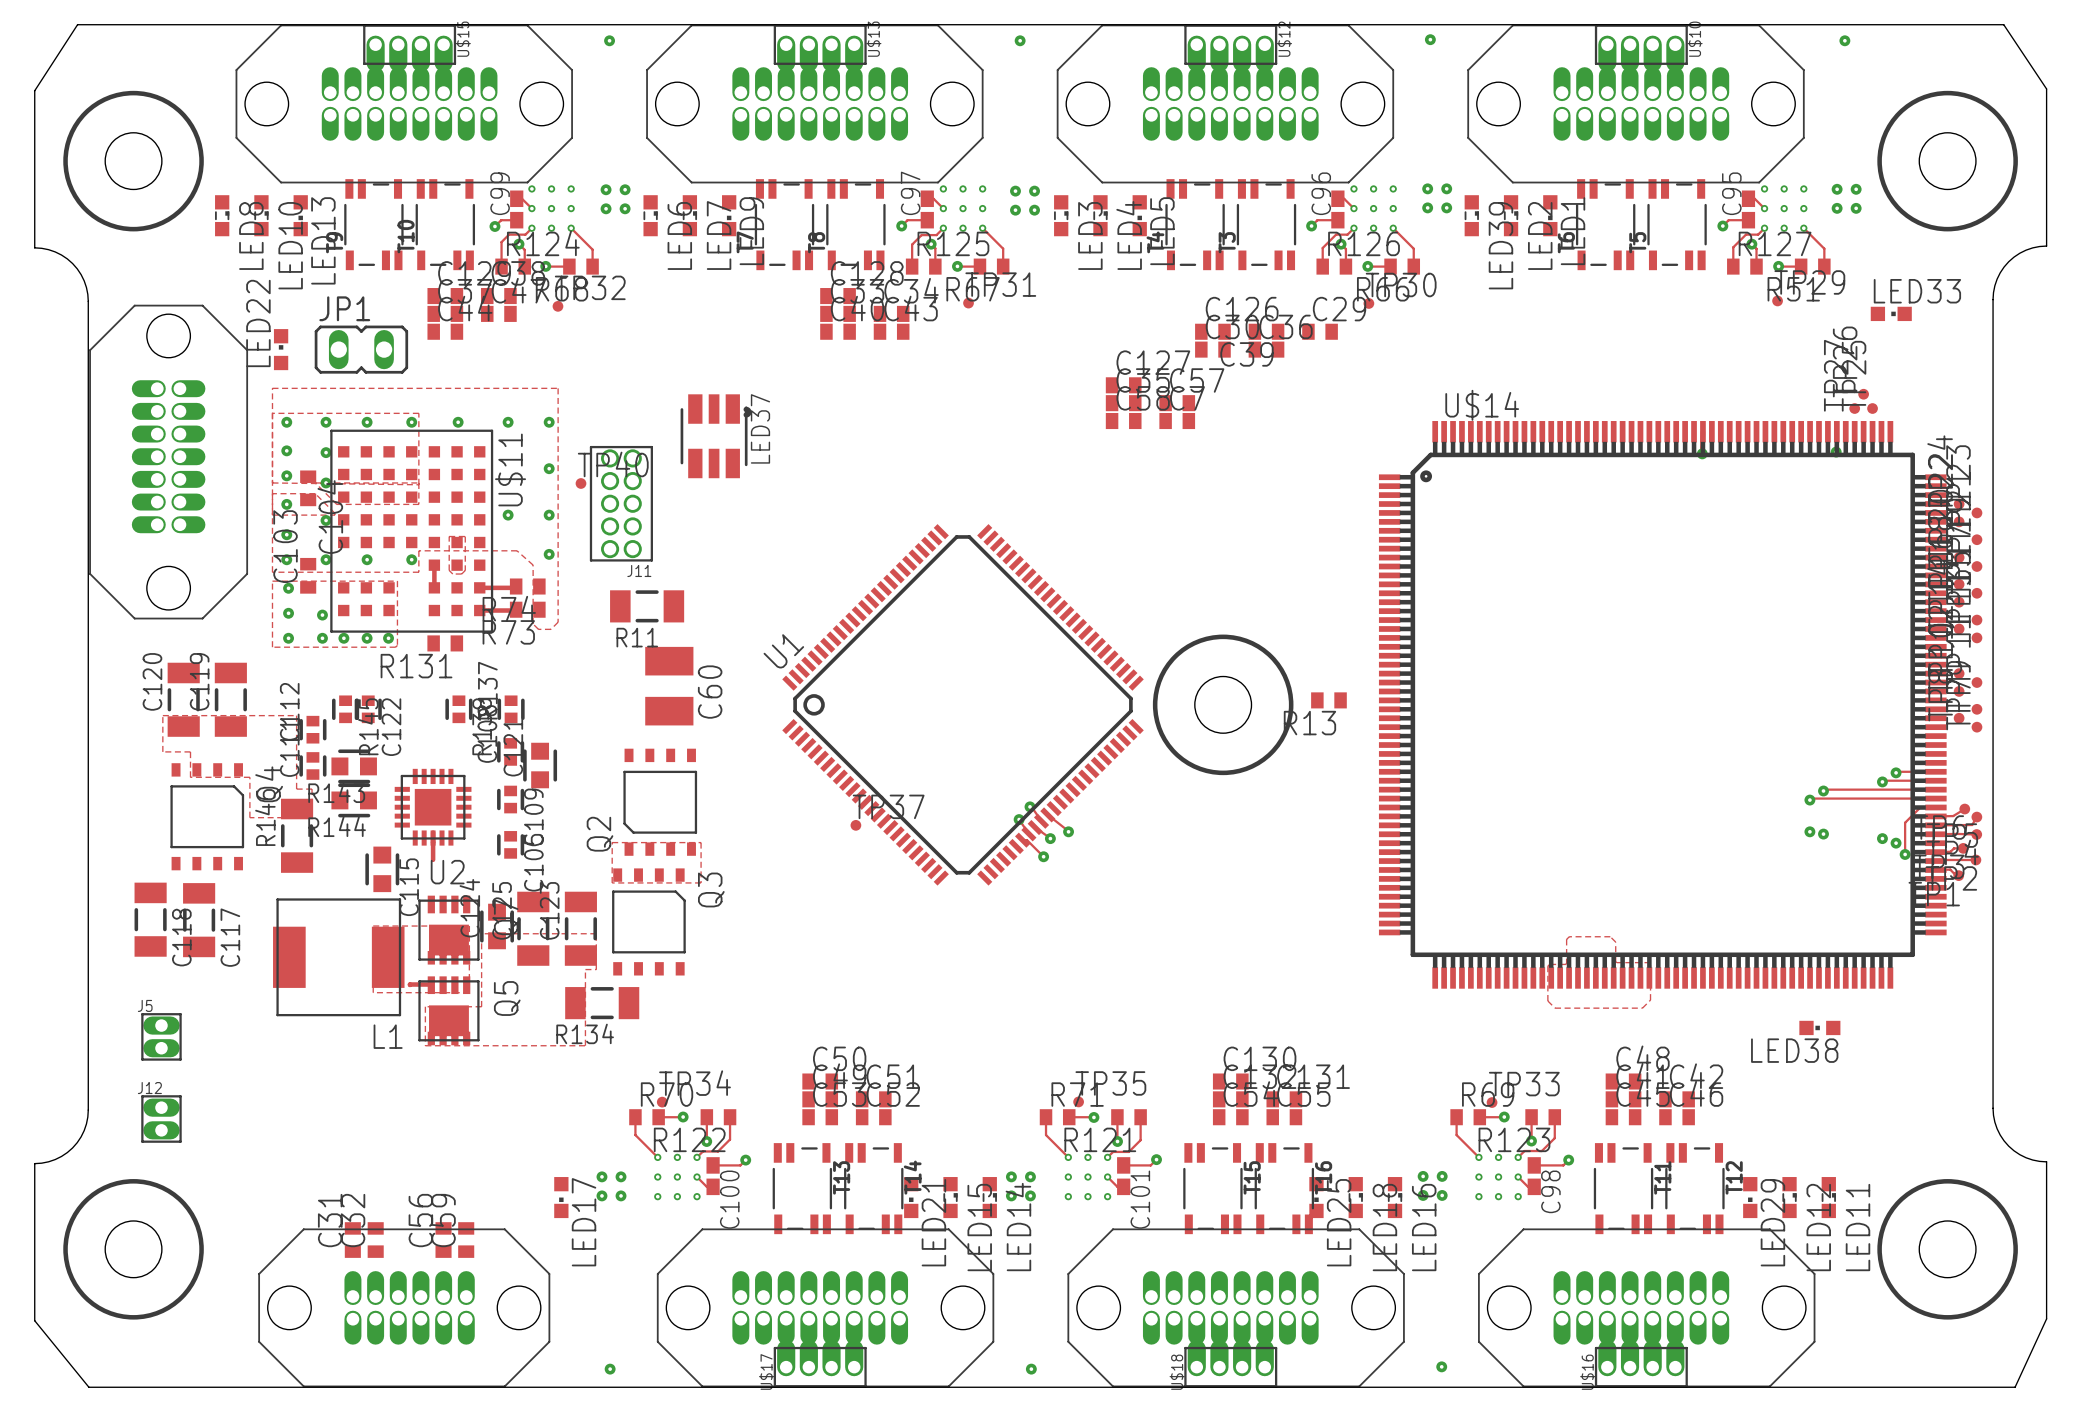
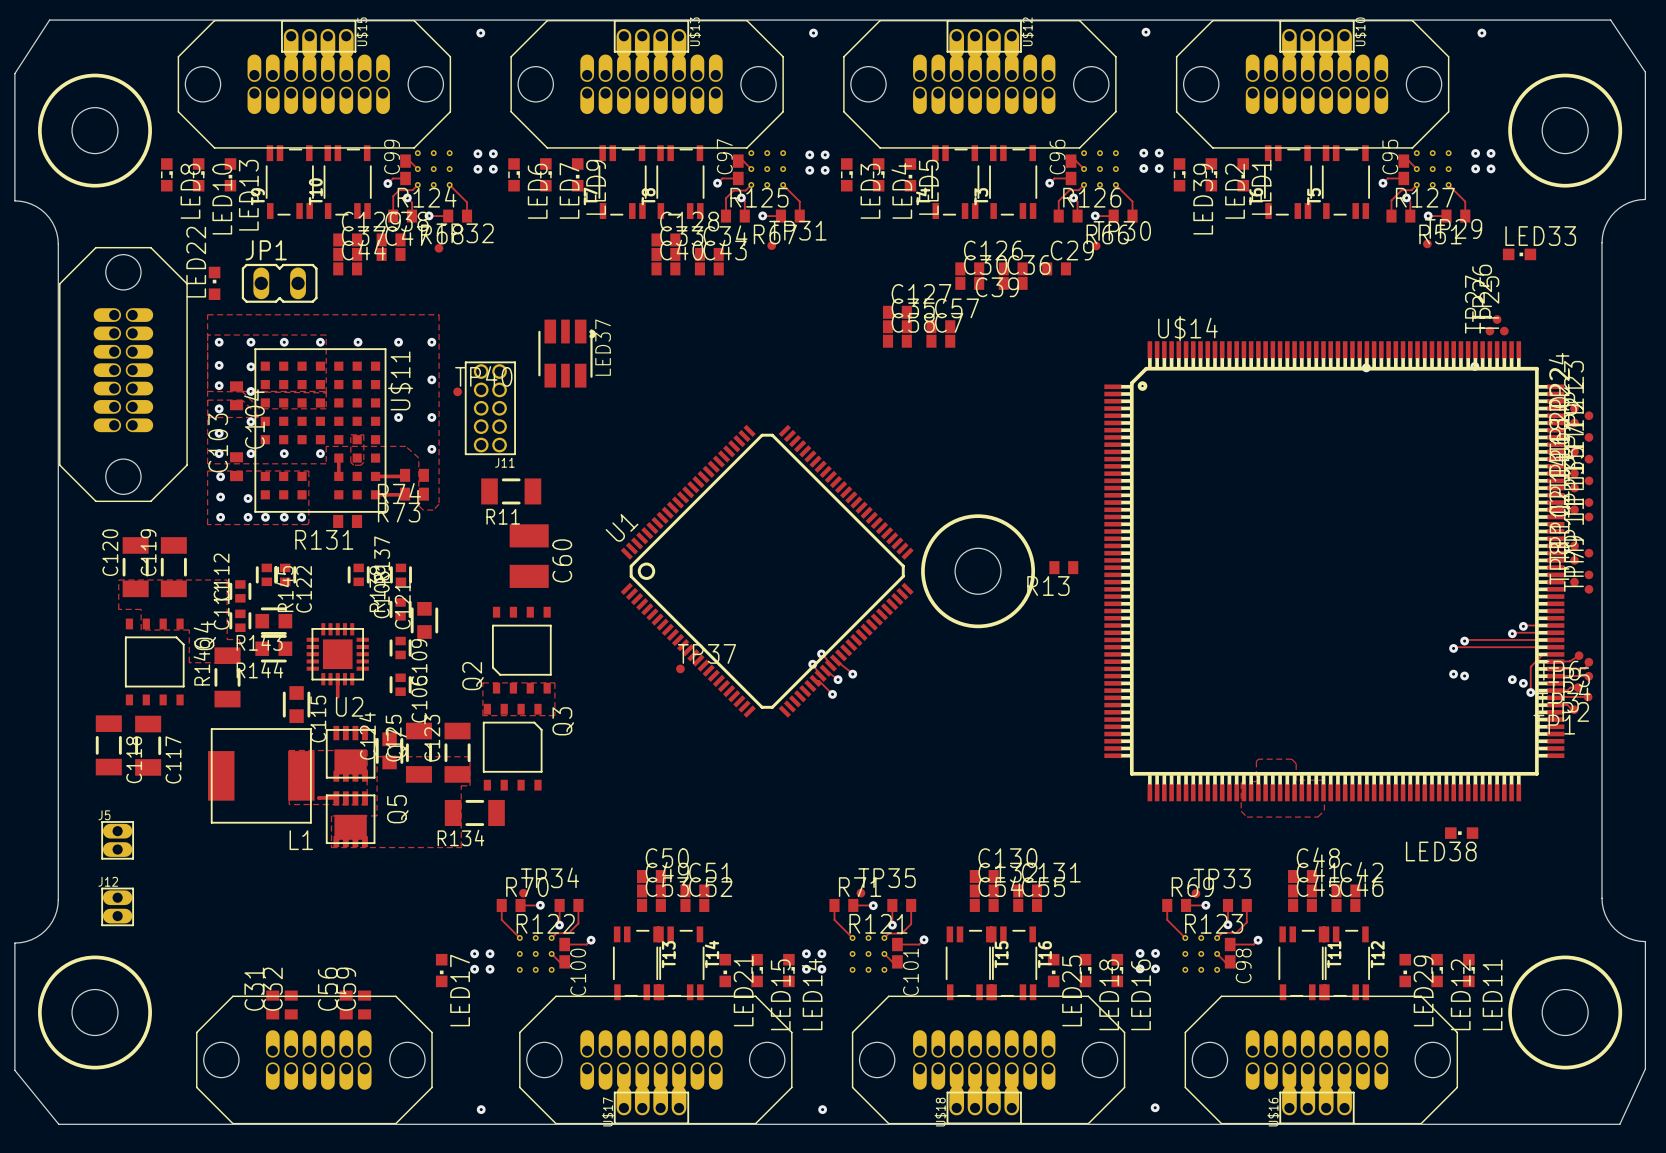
T14 position: (873, 1188) -> (680, 963)
T16 position: (1284, 1188) -> (1013, 963)
T12 position: (1694, 1188) -> (1345, 963)

